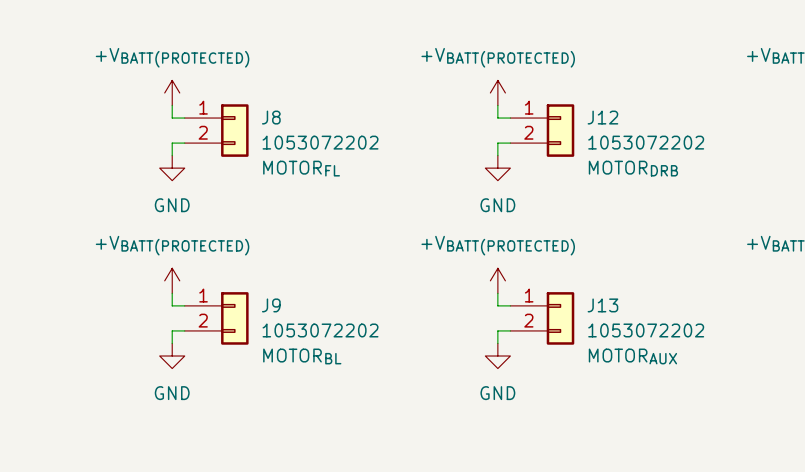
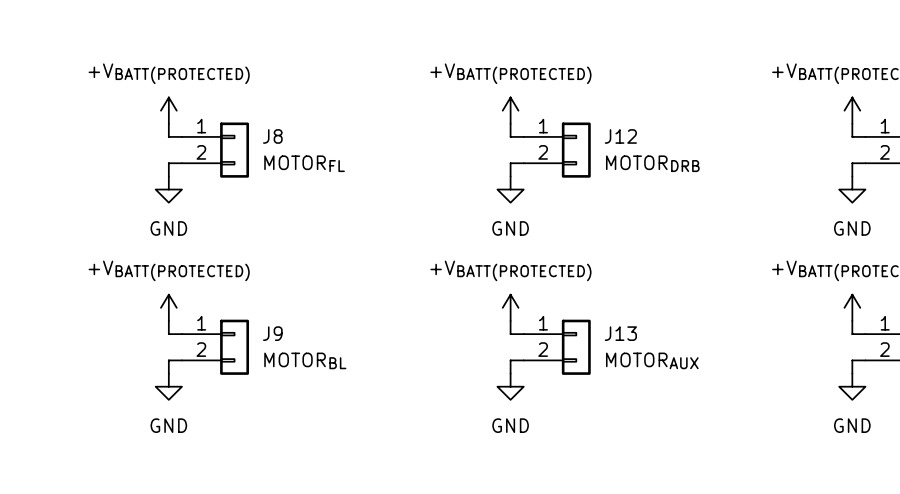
J8 value: 1053072202 (320, 142) -> MOTORFL (304, 163)
J12 value: 1053072202 (646, 142) -> MOTORDRB (652, 163)
J8 text: MOTORFL (301, 168) -> none
J12 text: MOTORDRB (633, 168) -> none
J9 value: 1053072202 (320, 330) -> MOTORBL (305, 360)
J13 value: 1053072202 (646, 330) -> MOTORAUX (652, 360)
J9 text: MOTORBL (302, 356) -> none
J13 text: MOTORAUX (632, 356) -> none

